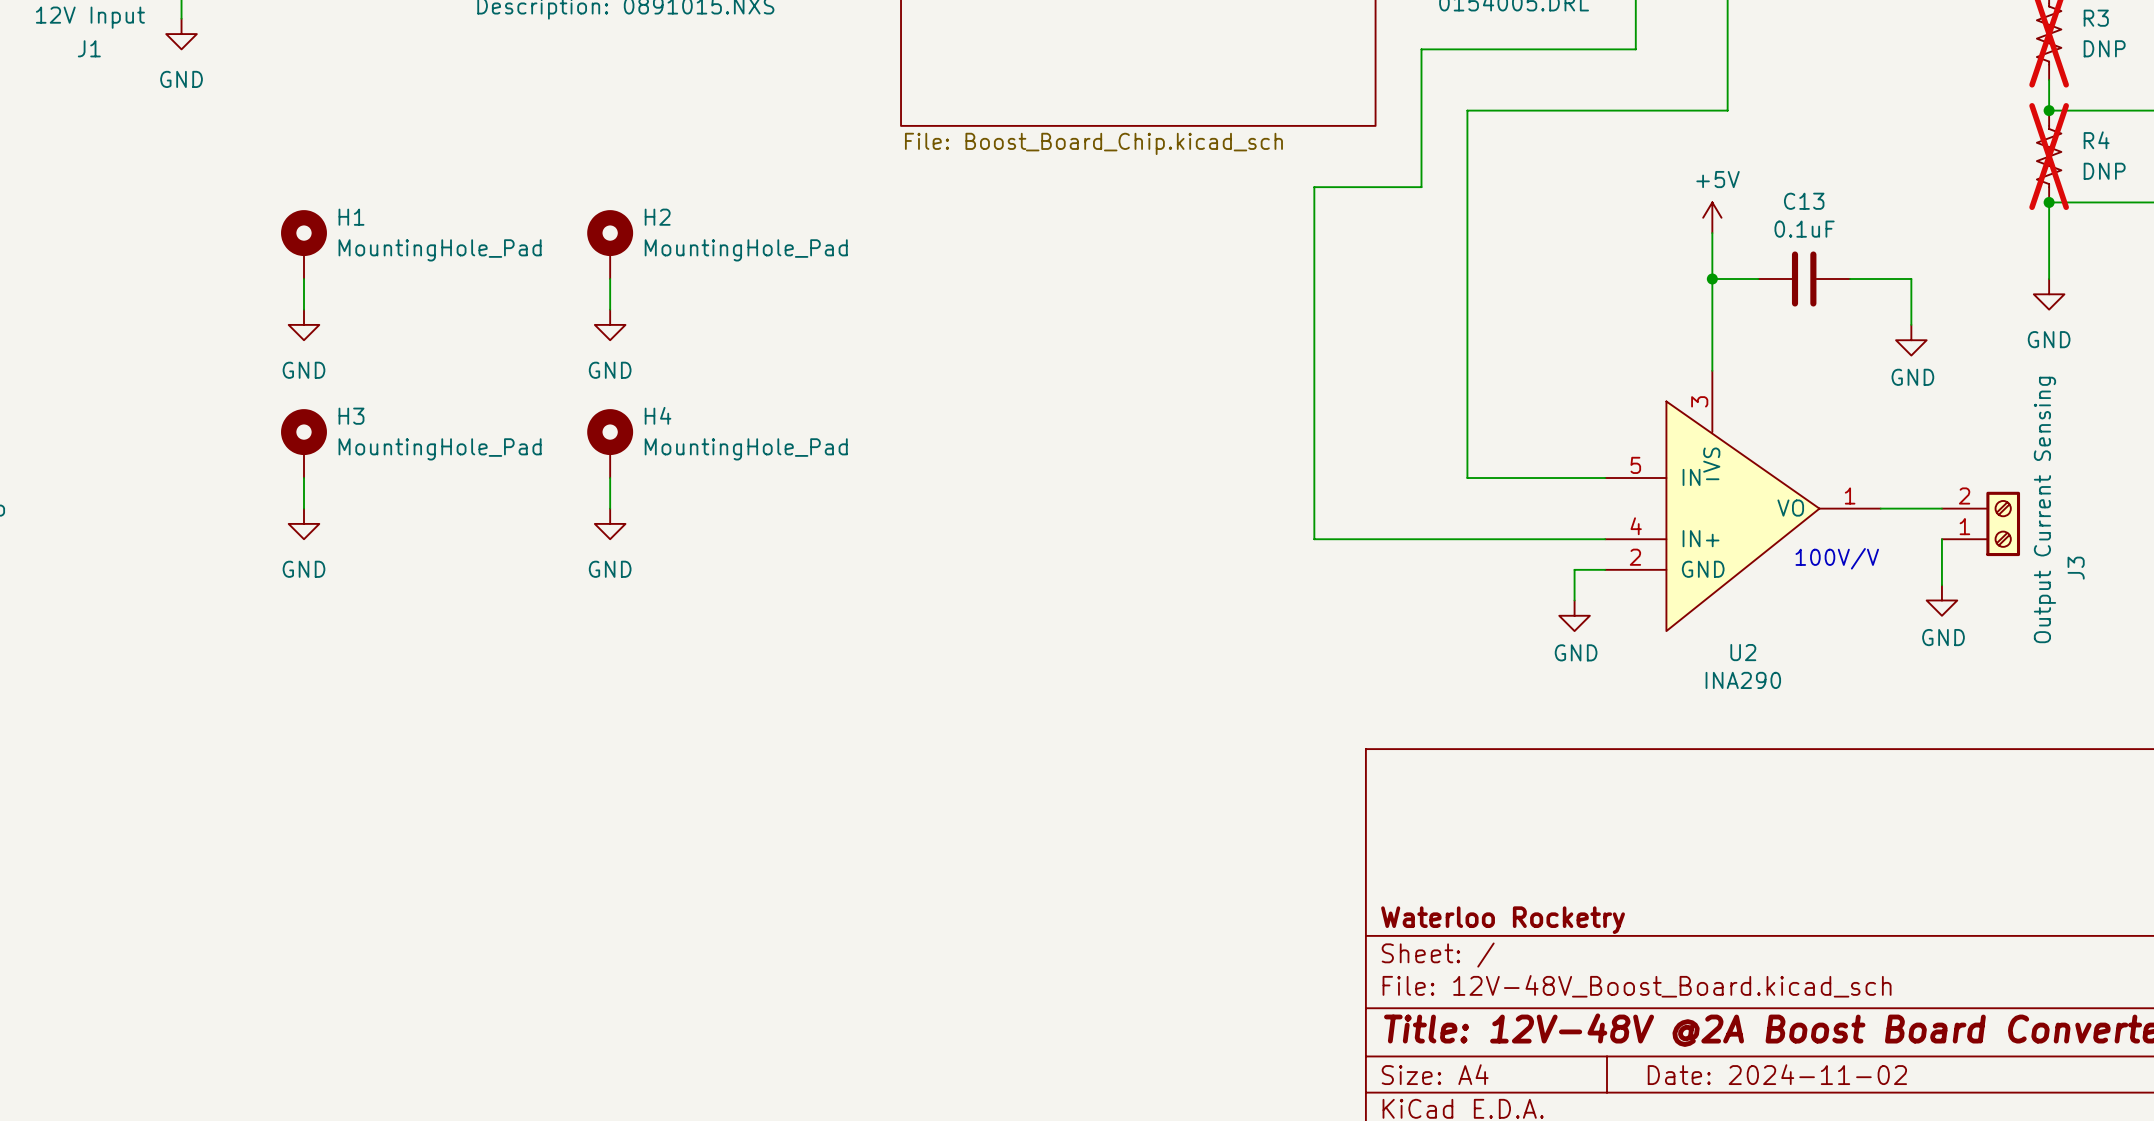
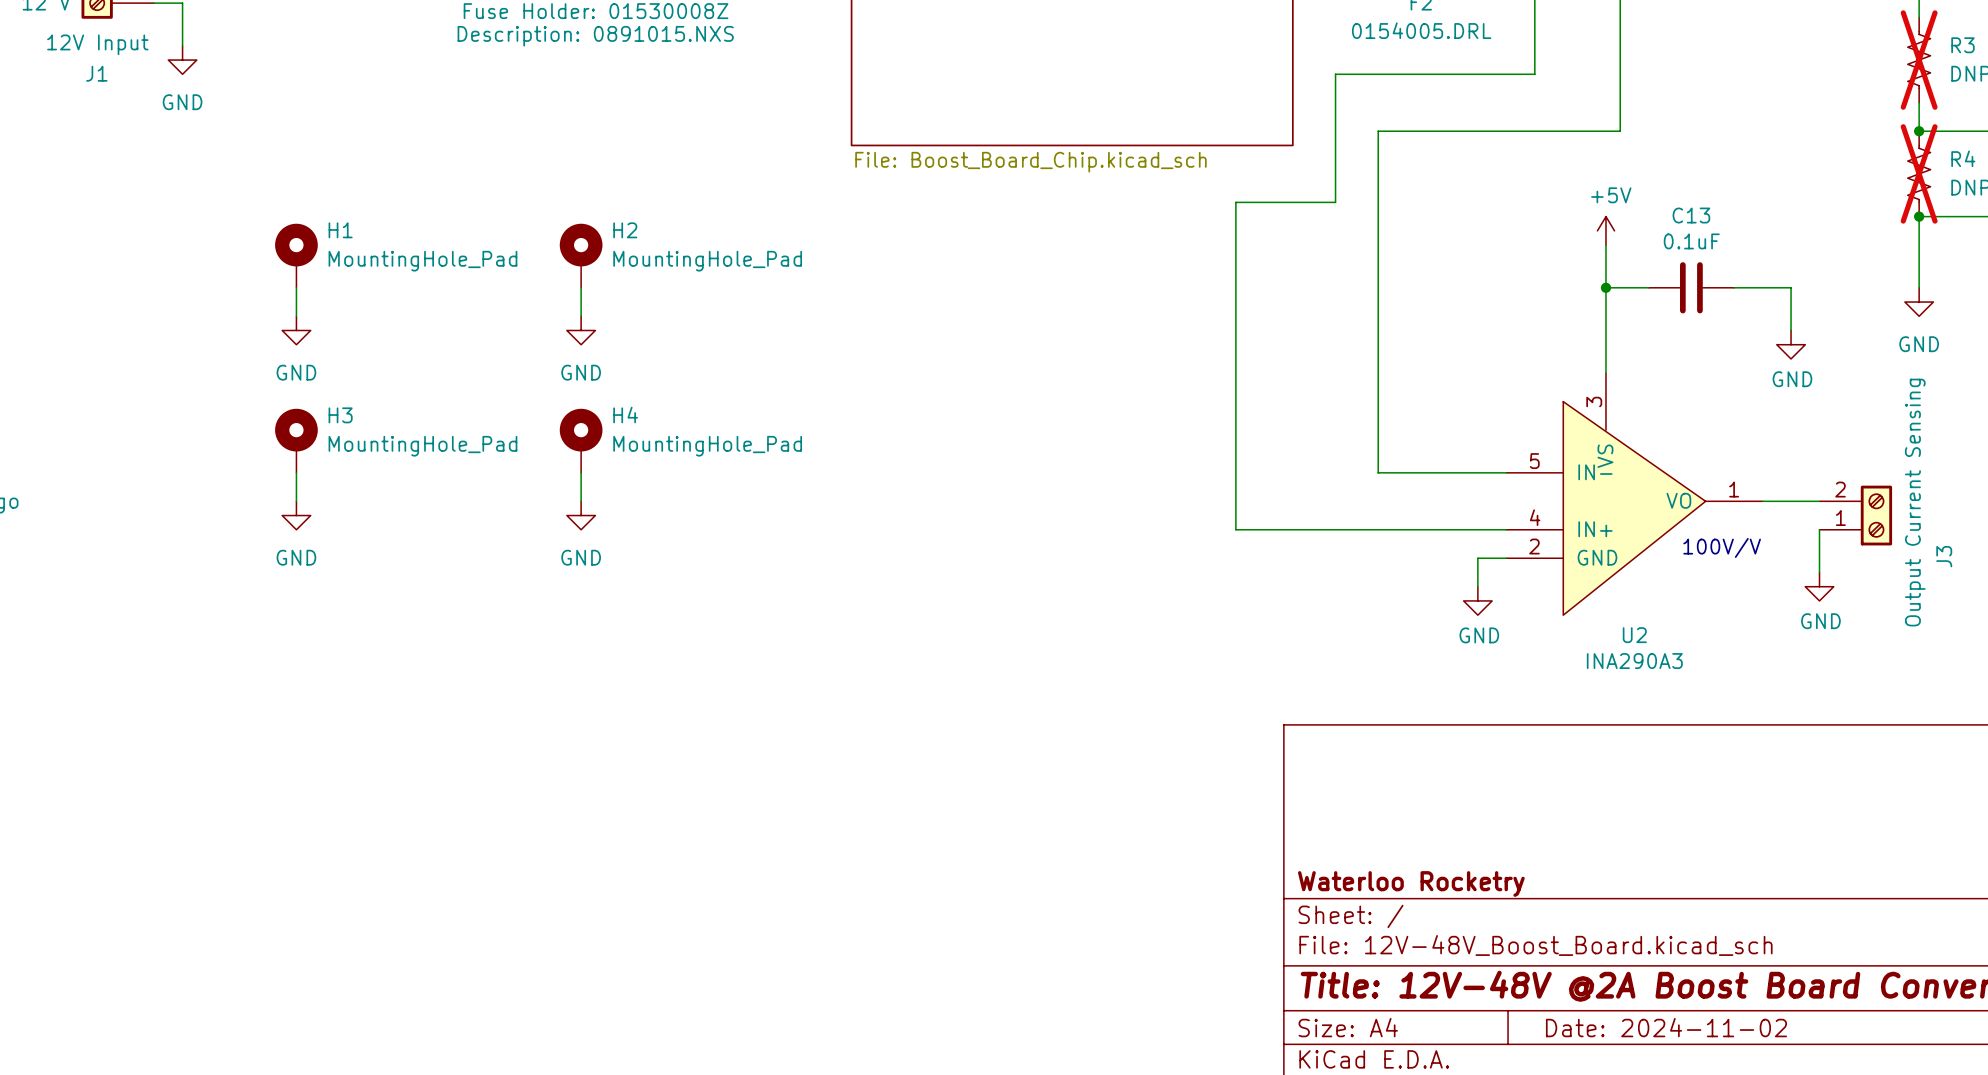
U2 value: INA290 (1743, 680) -> INA290A3 (1634, 661)

